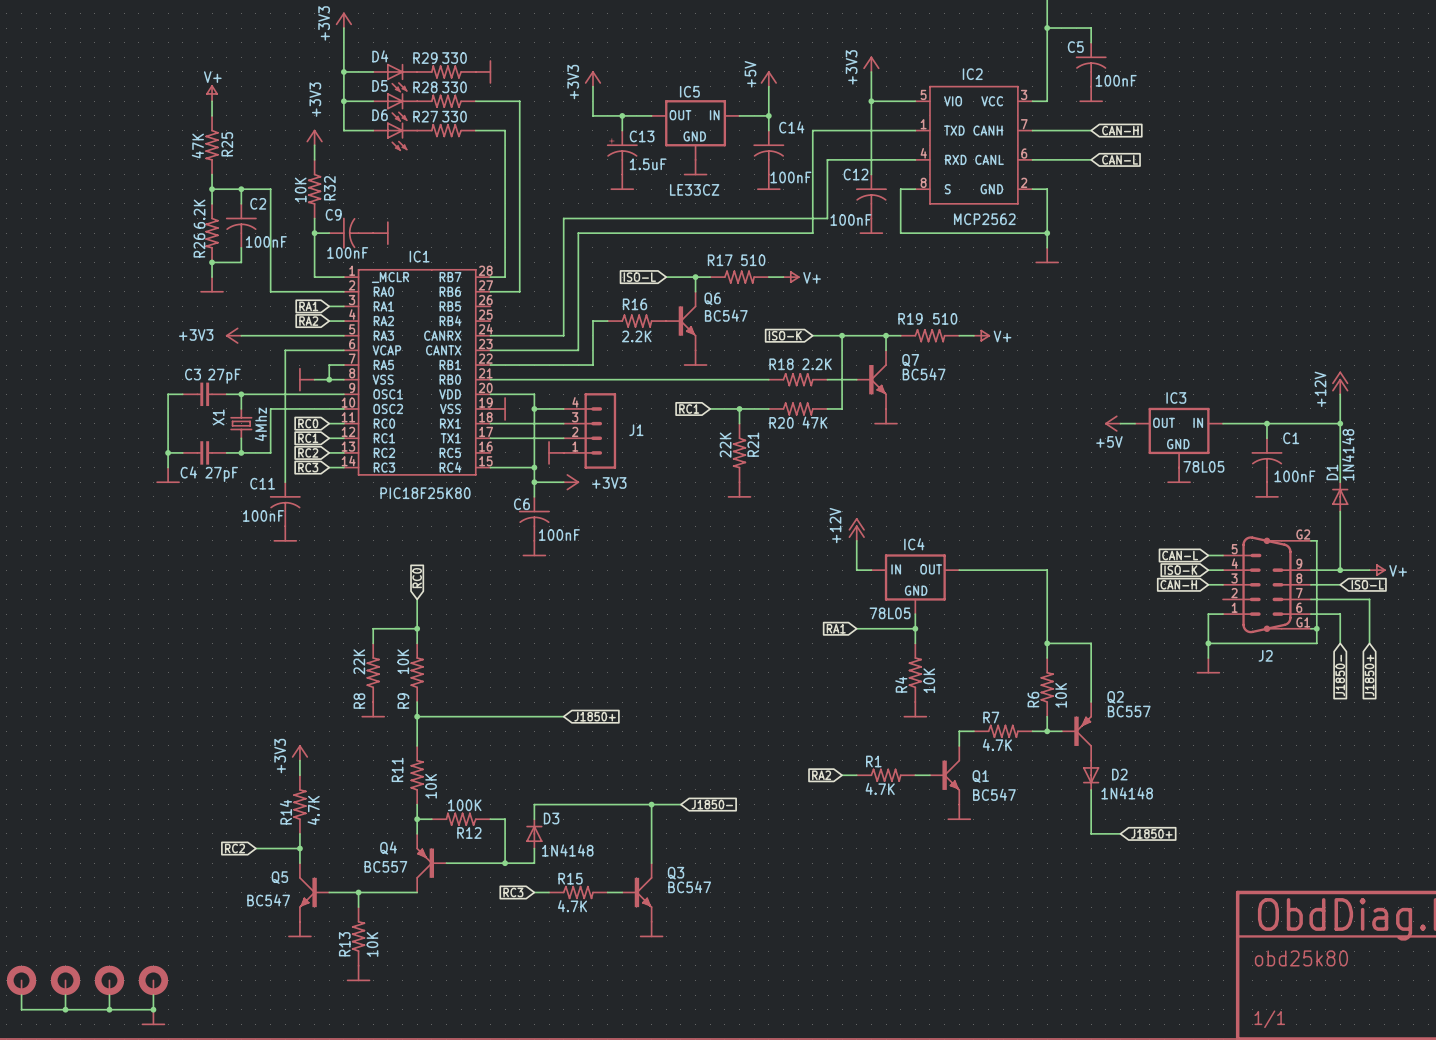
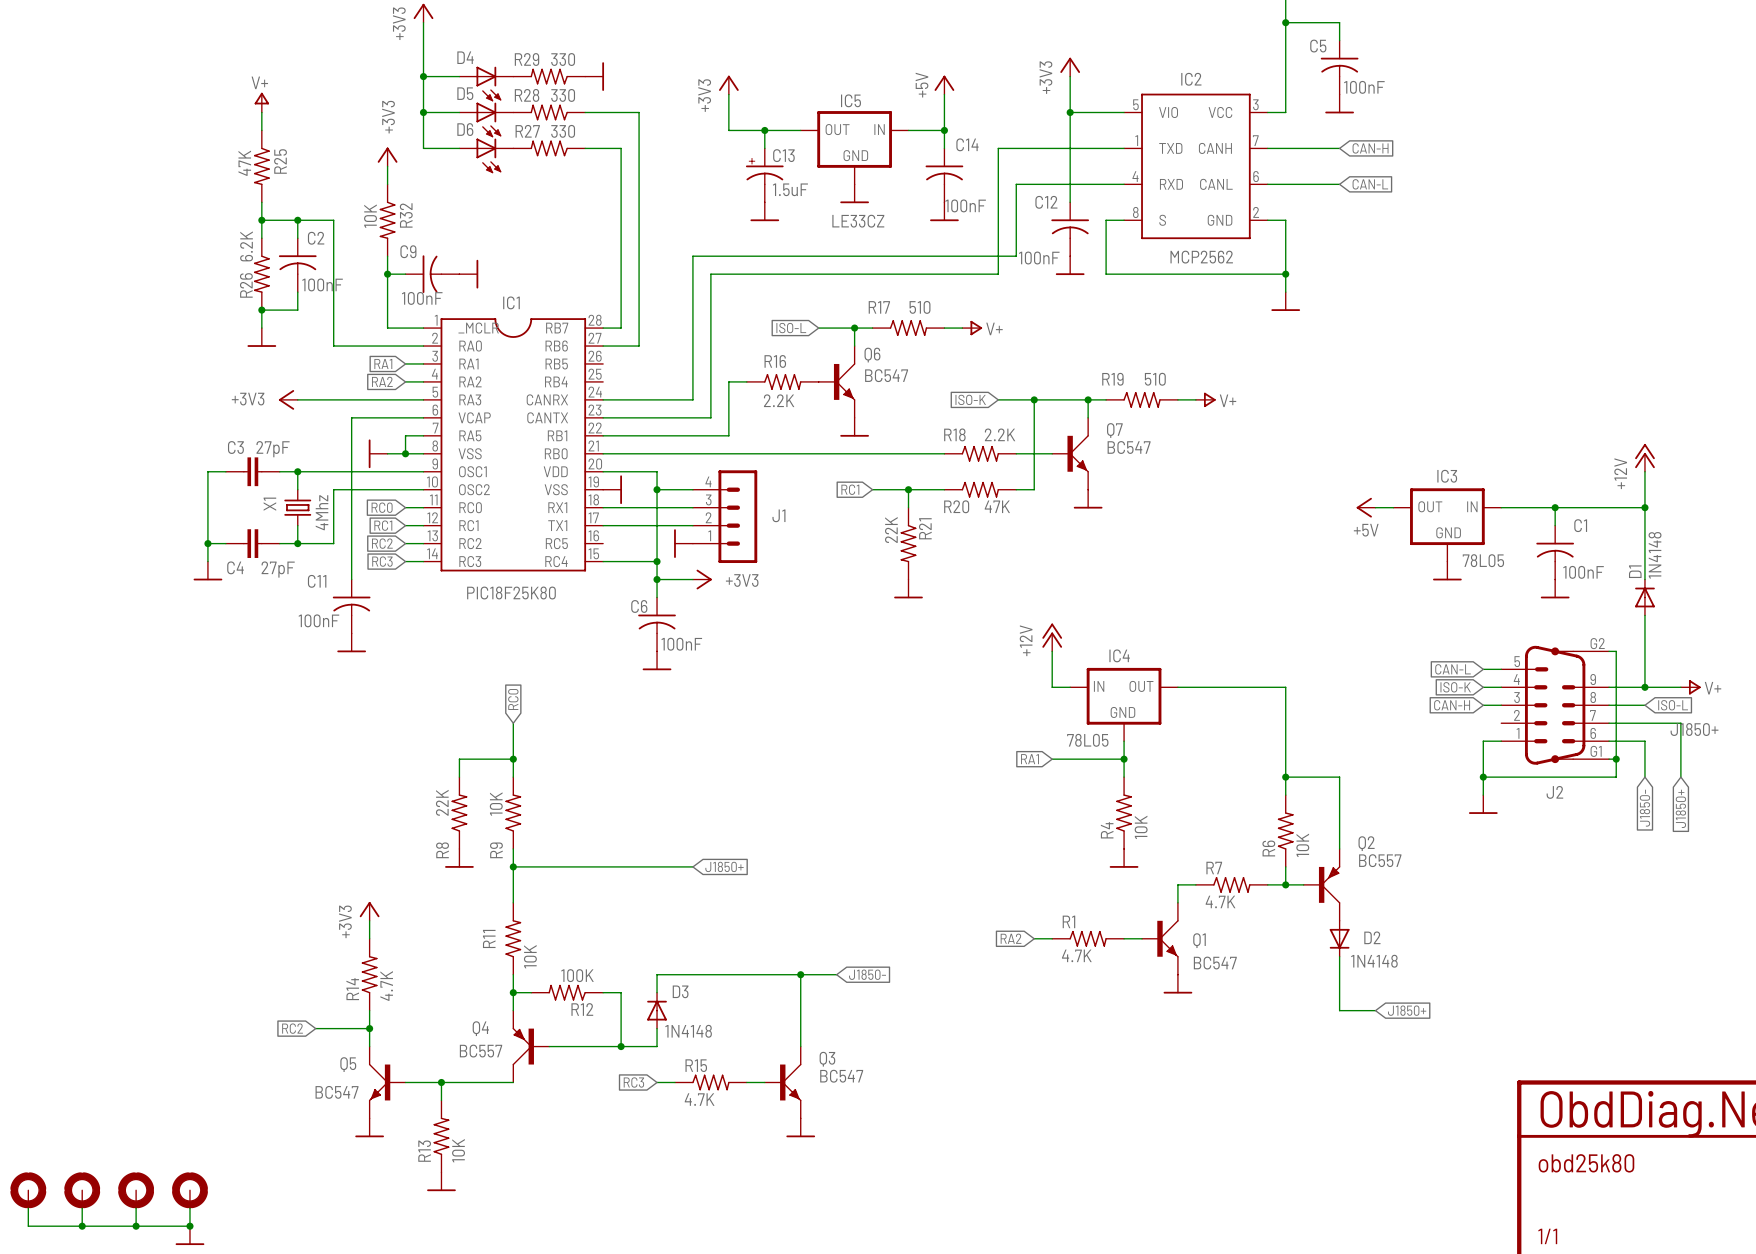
IC1 symbol: [343, 269, 491, 476] -> [423, 318, 604, 572]
label: none -> J1850+ (1694, 729)

